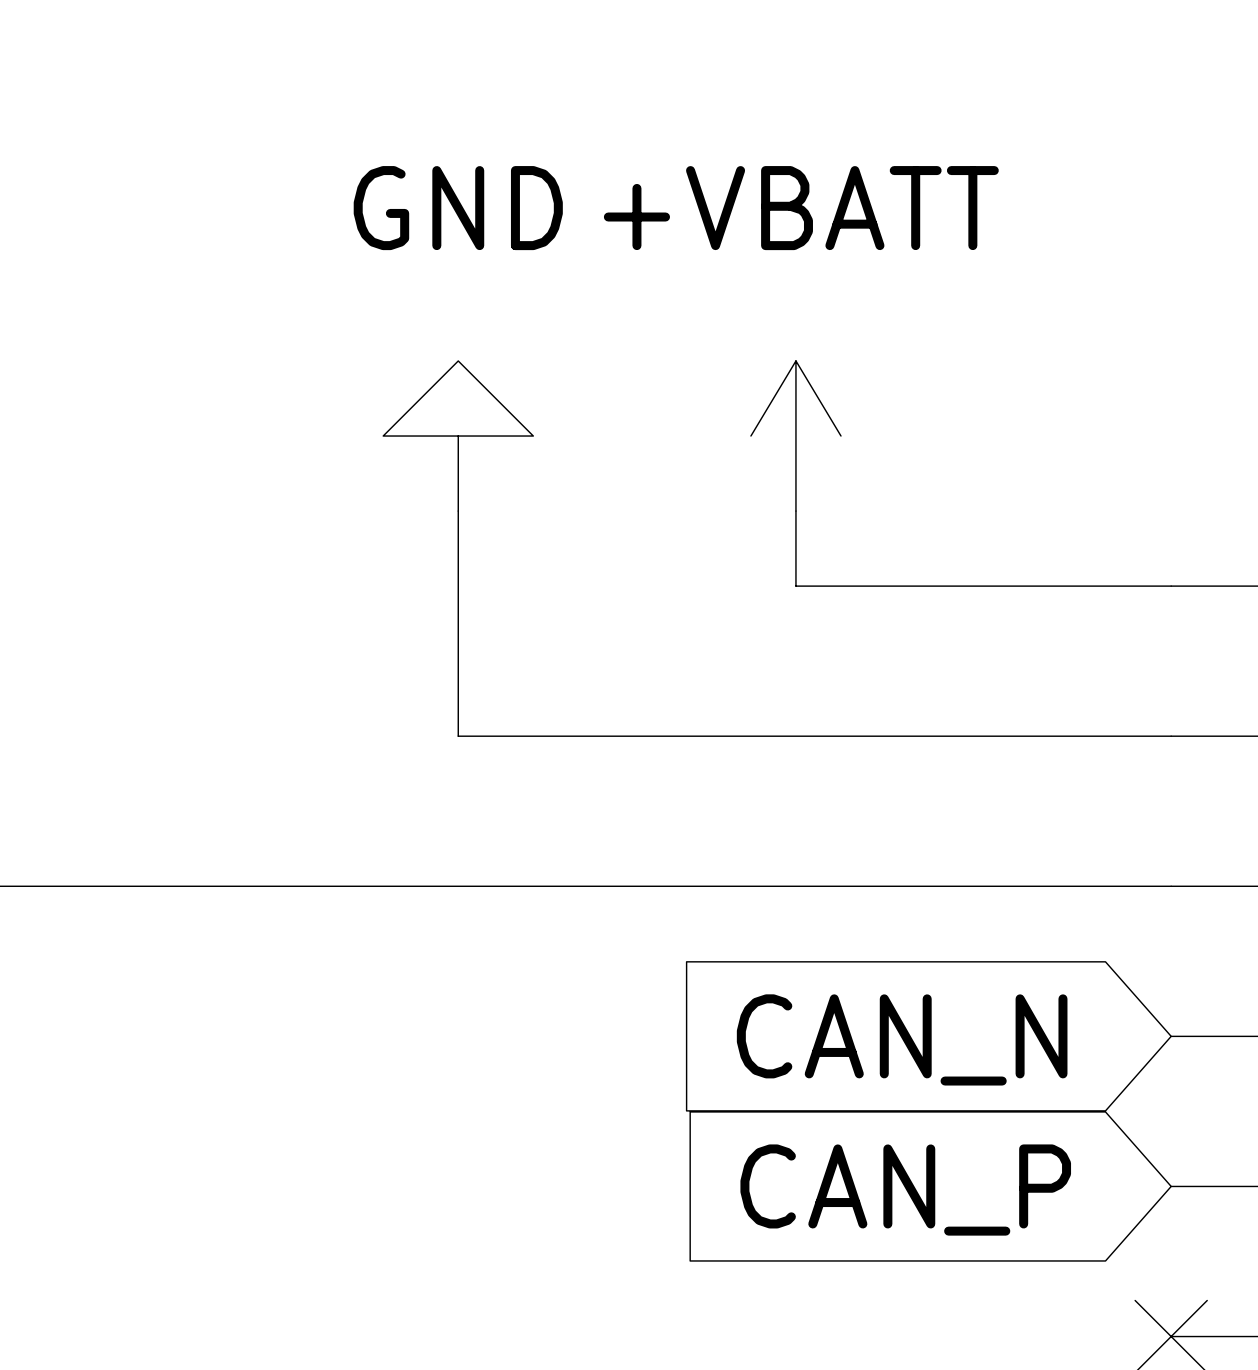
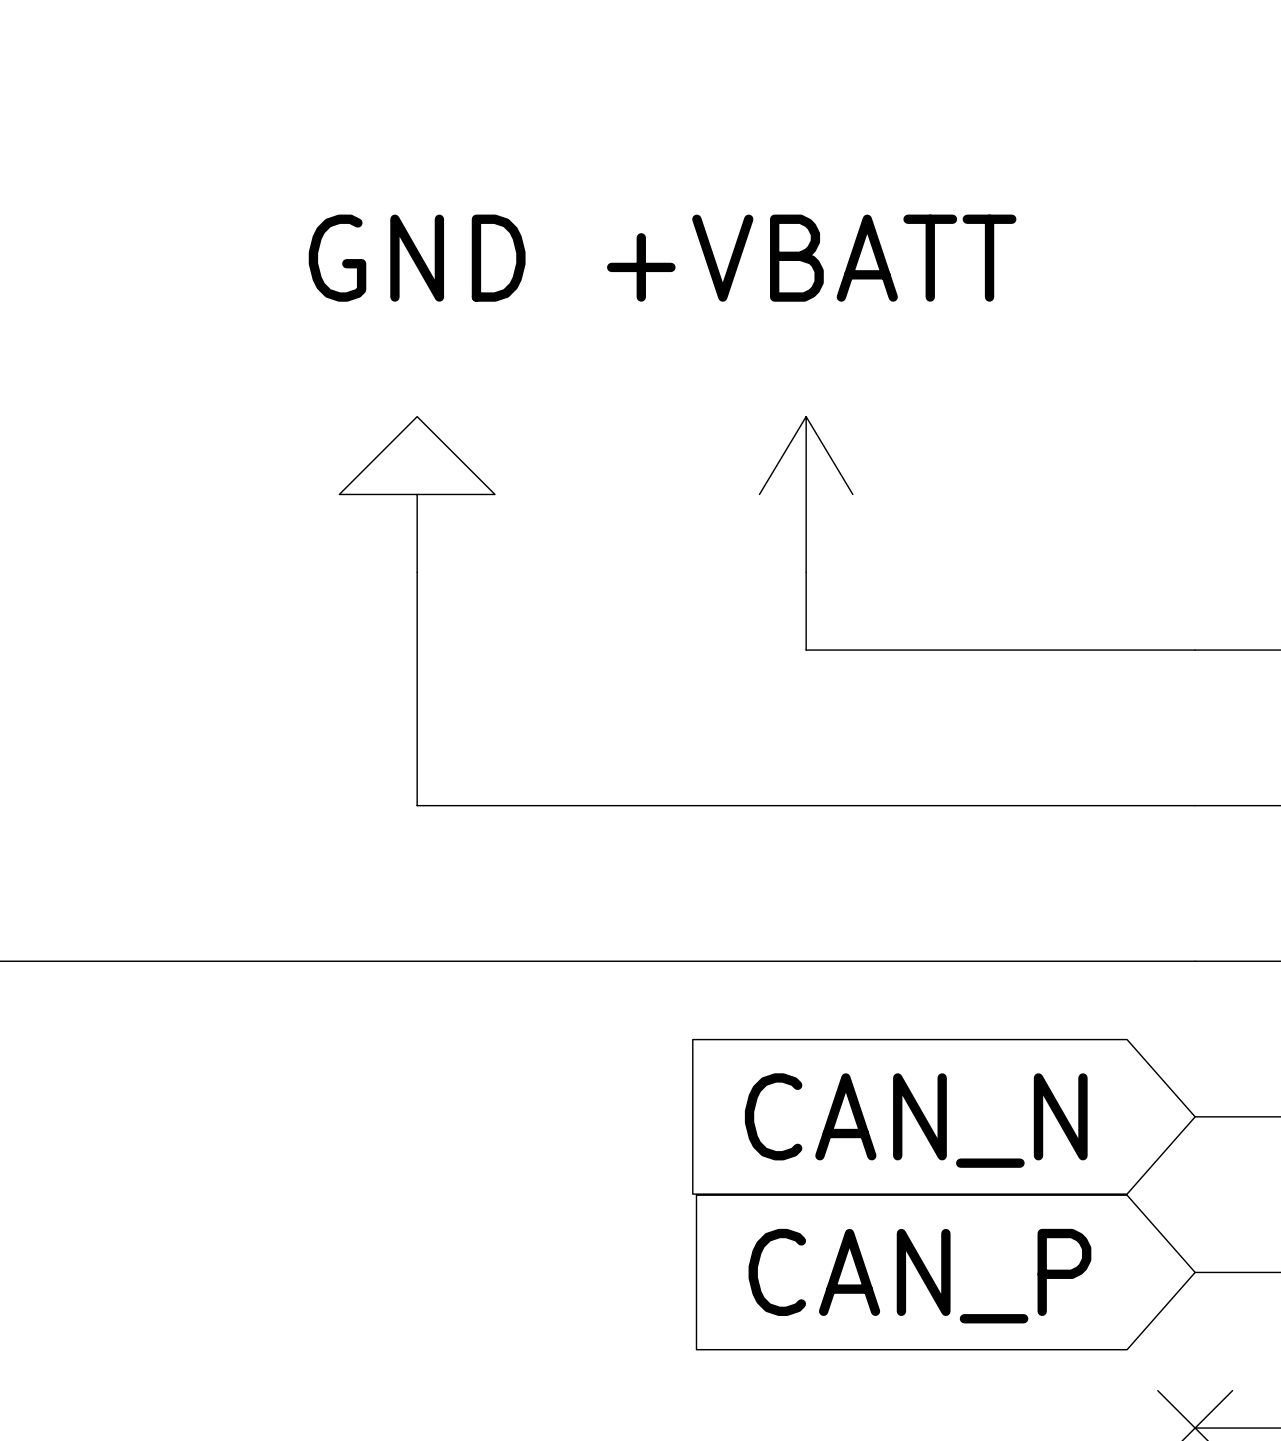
power symbol position: GND (458, 436) -> GND (417, 494)
wire: (458, 511) (458, 736) -> (417, 572) (417, 805) (456, 805)

